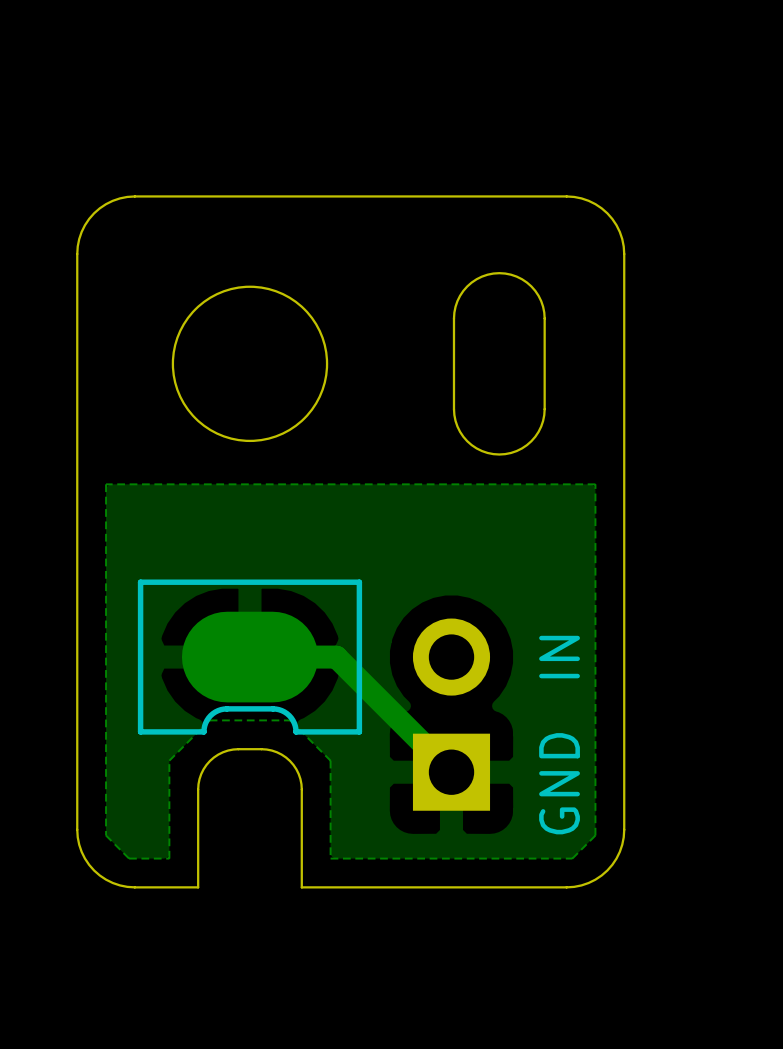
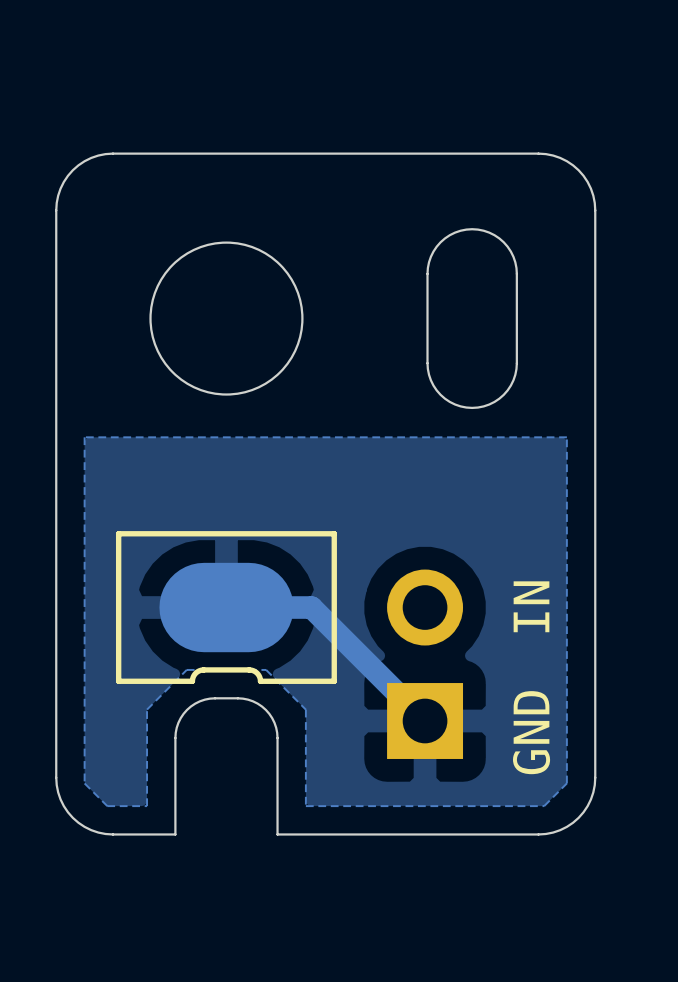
part footprint: [137, 579, 363, 735] -> [115, 531, 337, 684]

